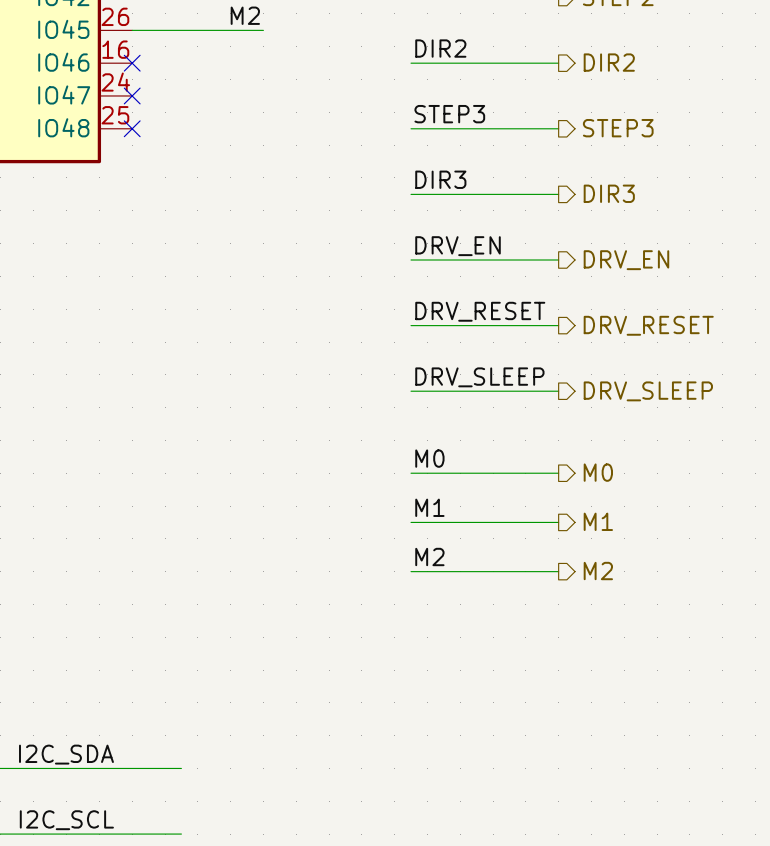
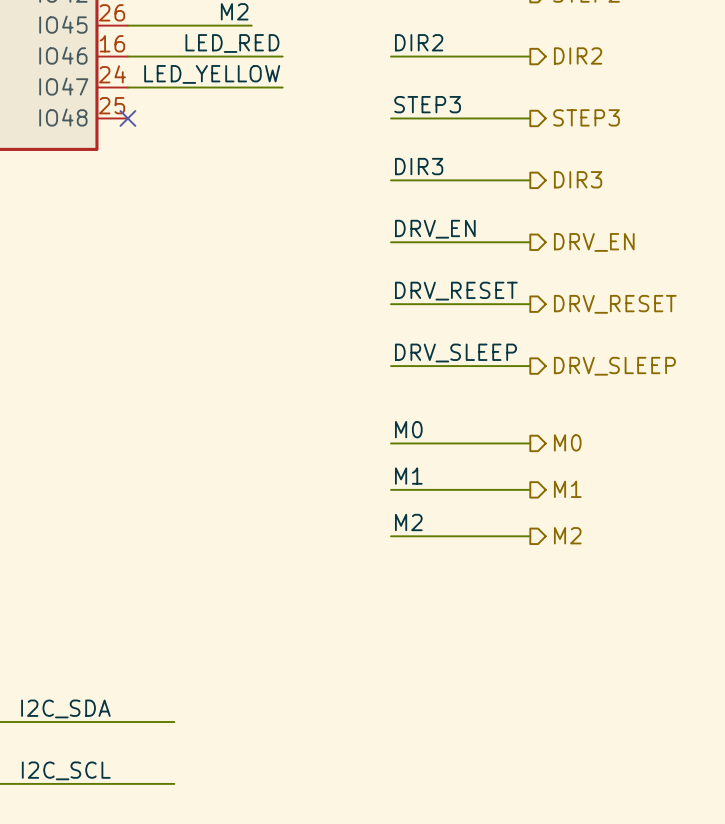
label: none -> LED_RED (232, 43)
wire: none -> (127, 56) (282, 56)
no-connect mark: (132, 63) -> none
label: none -> LED_YELLOW (212, 74)
wire: none -> (127, 87) (282, 87)
no-connect mark: (132, 95) -> none

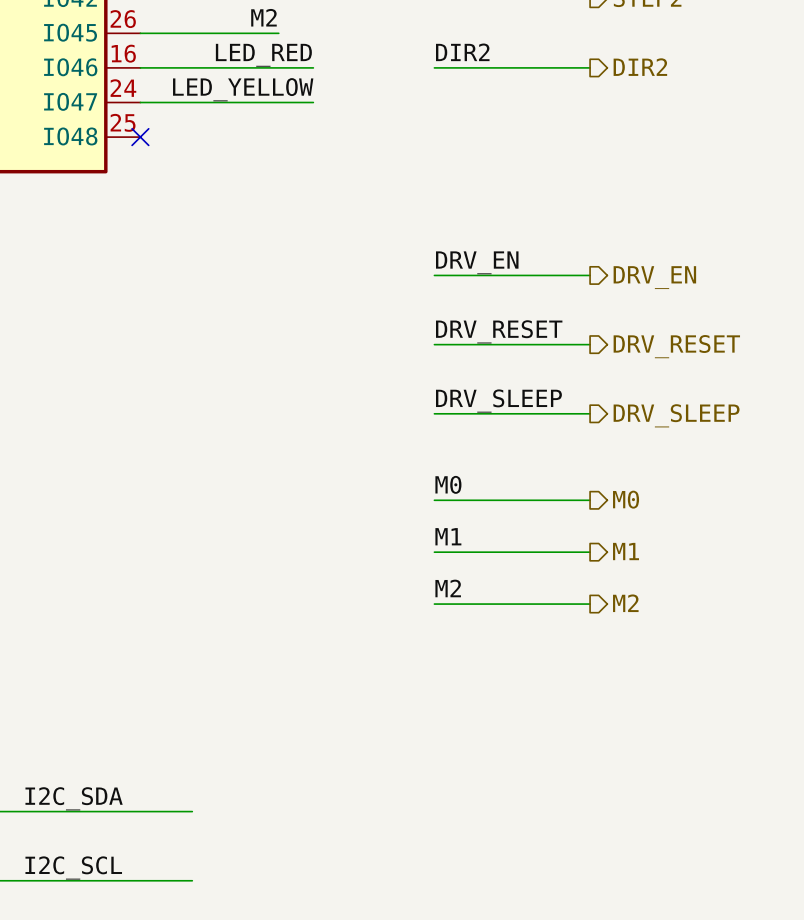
label: STEP3 (427, 104) -> none
hierarchical label: STEP3 (586, 117) -> none
wire: (391, 118) (530, 118) -> none
label: DIR3 (419, 166) -> none
hierarchical label: DIR3 (578, 179) -> none
wire: (391, 180) (530, 180) -> none

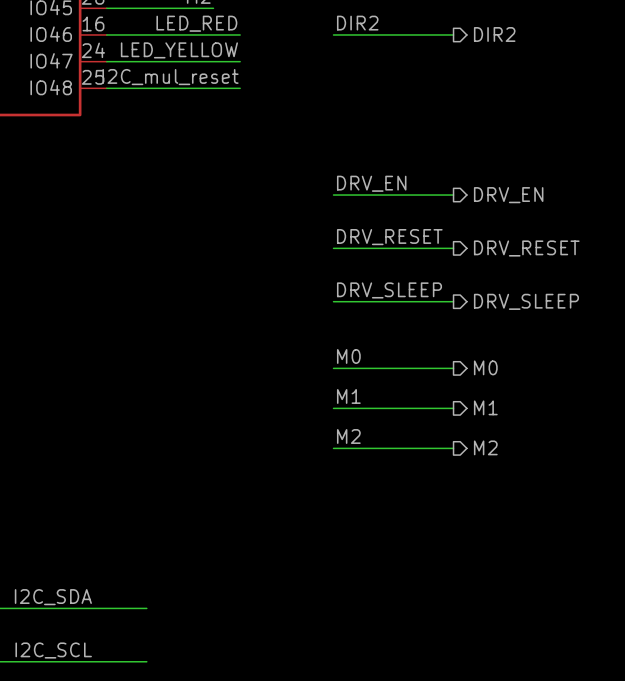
label: none -> I2C_mul_reset (170, 77)
wire: none -> (106, 88) (240, 88)
no-connect mark: (140, 137) -> none

